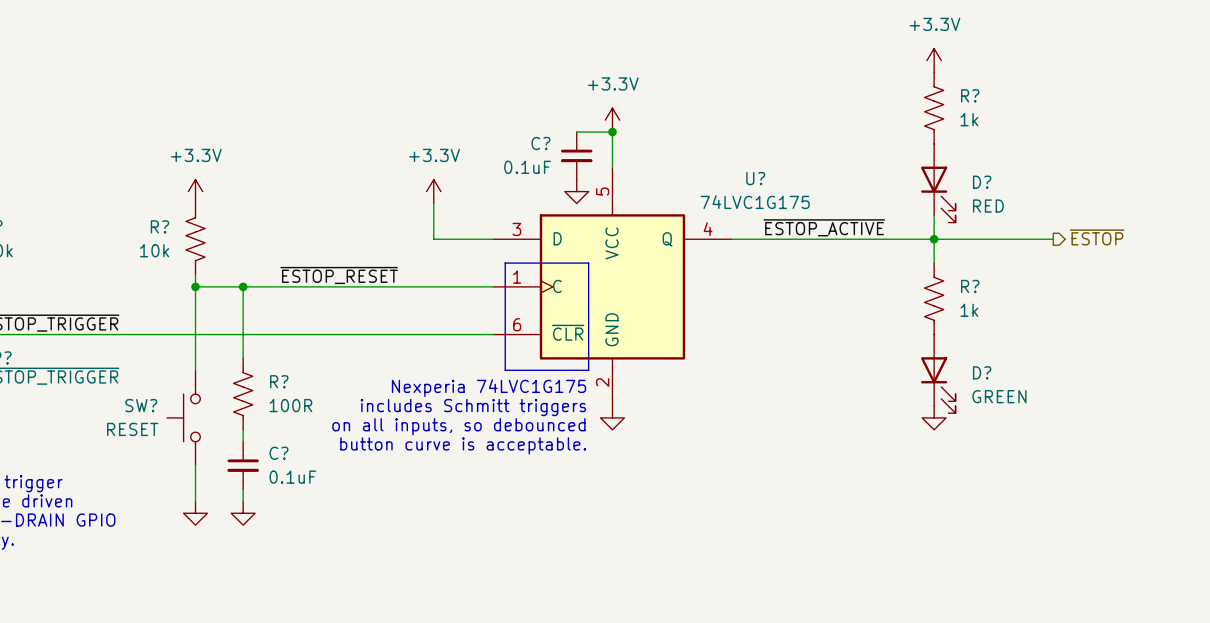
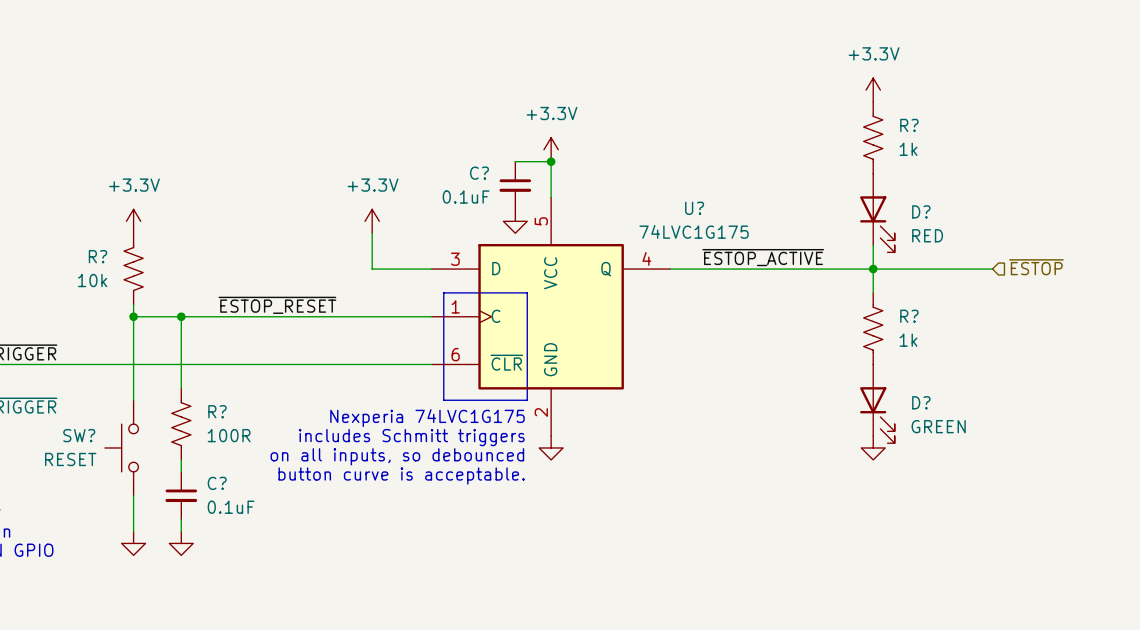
hierarchical label shape: output (1097, 237) -> input (1036, 267)

